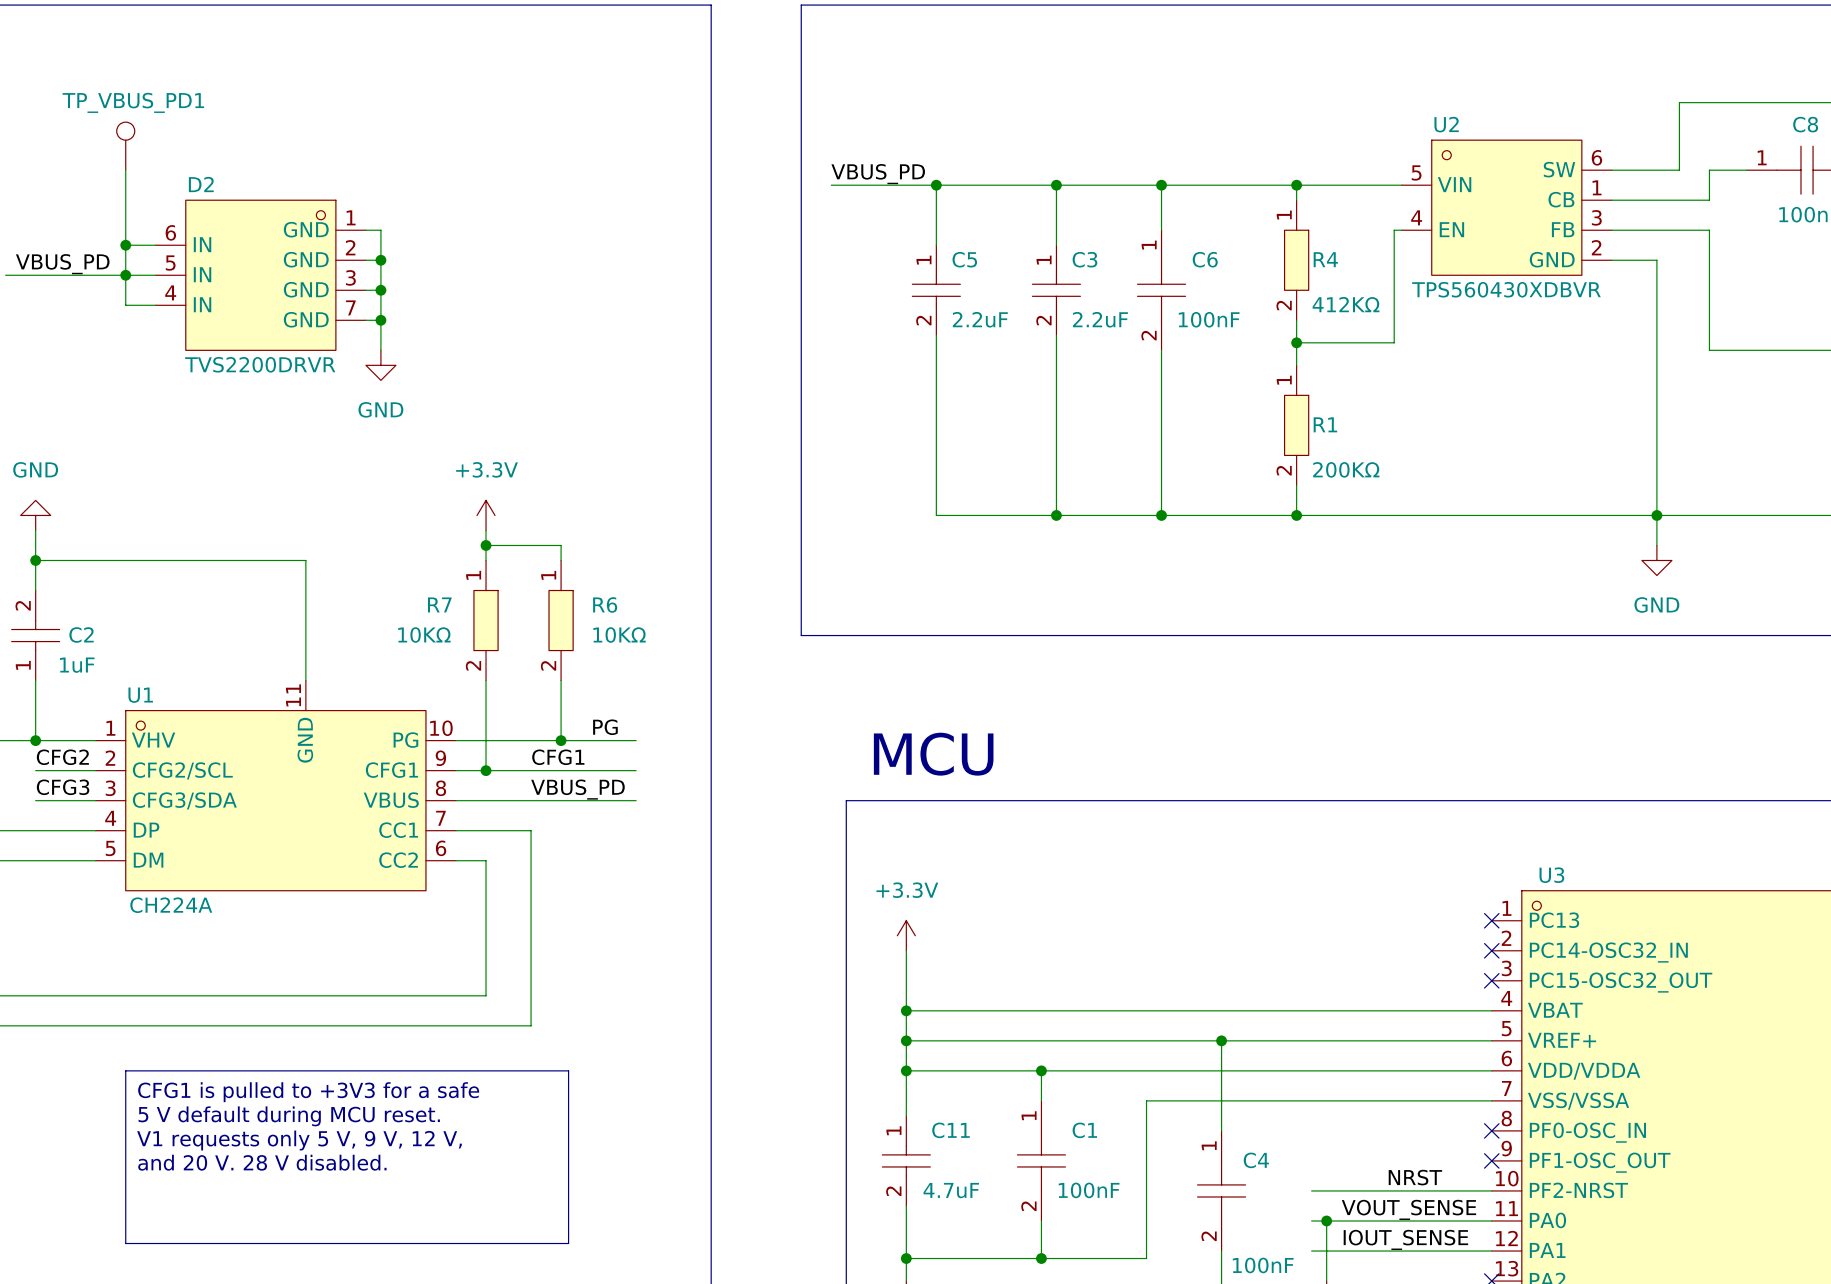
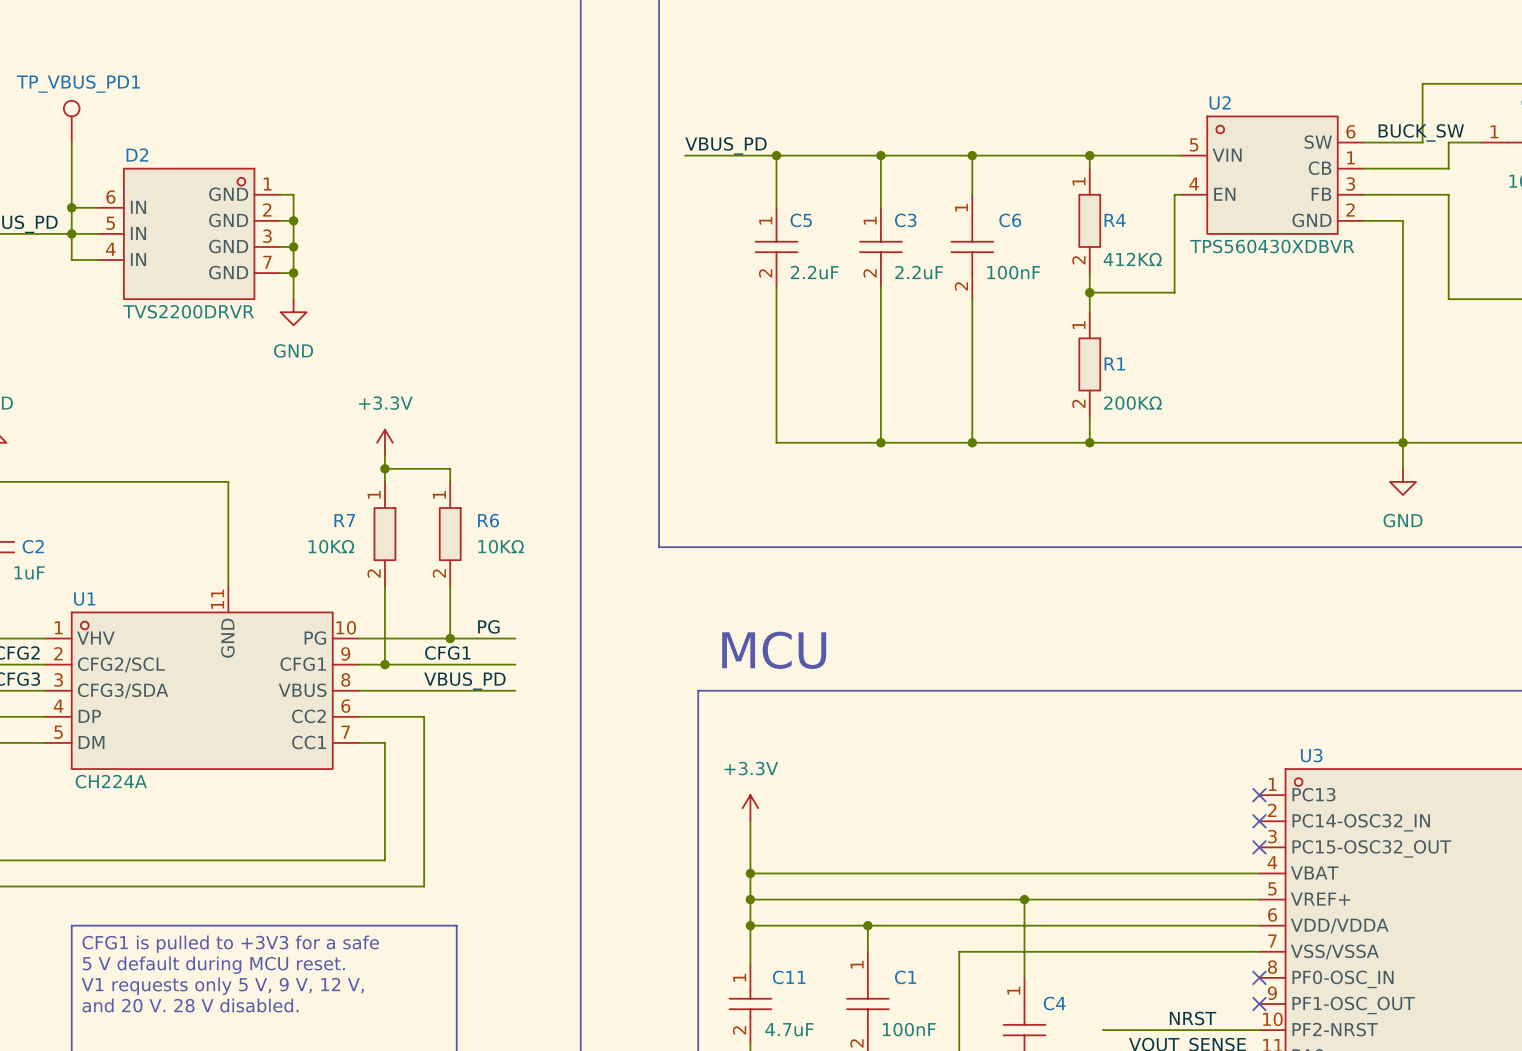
label: none -> BUCK_SW (1421, 132)
U1 pin number: 7 (440, 818) -> 6 (345, 706)
U1 pin name: CC1 (398, 830) -> CC2 (308, 716)
U1 pin number: 6 (441, 848) -> 7 (345, 732)
U1 pin name: CC2 (398, 860) -> CC1 (309, 742)

